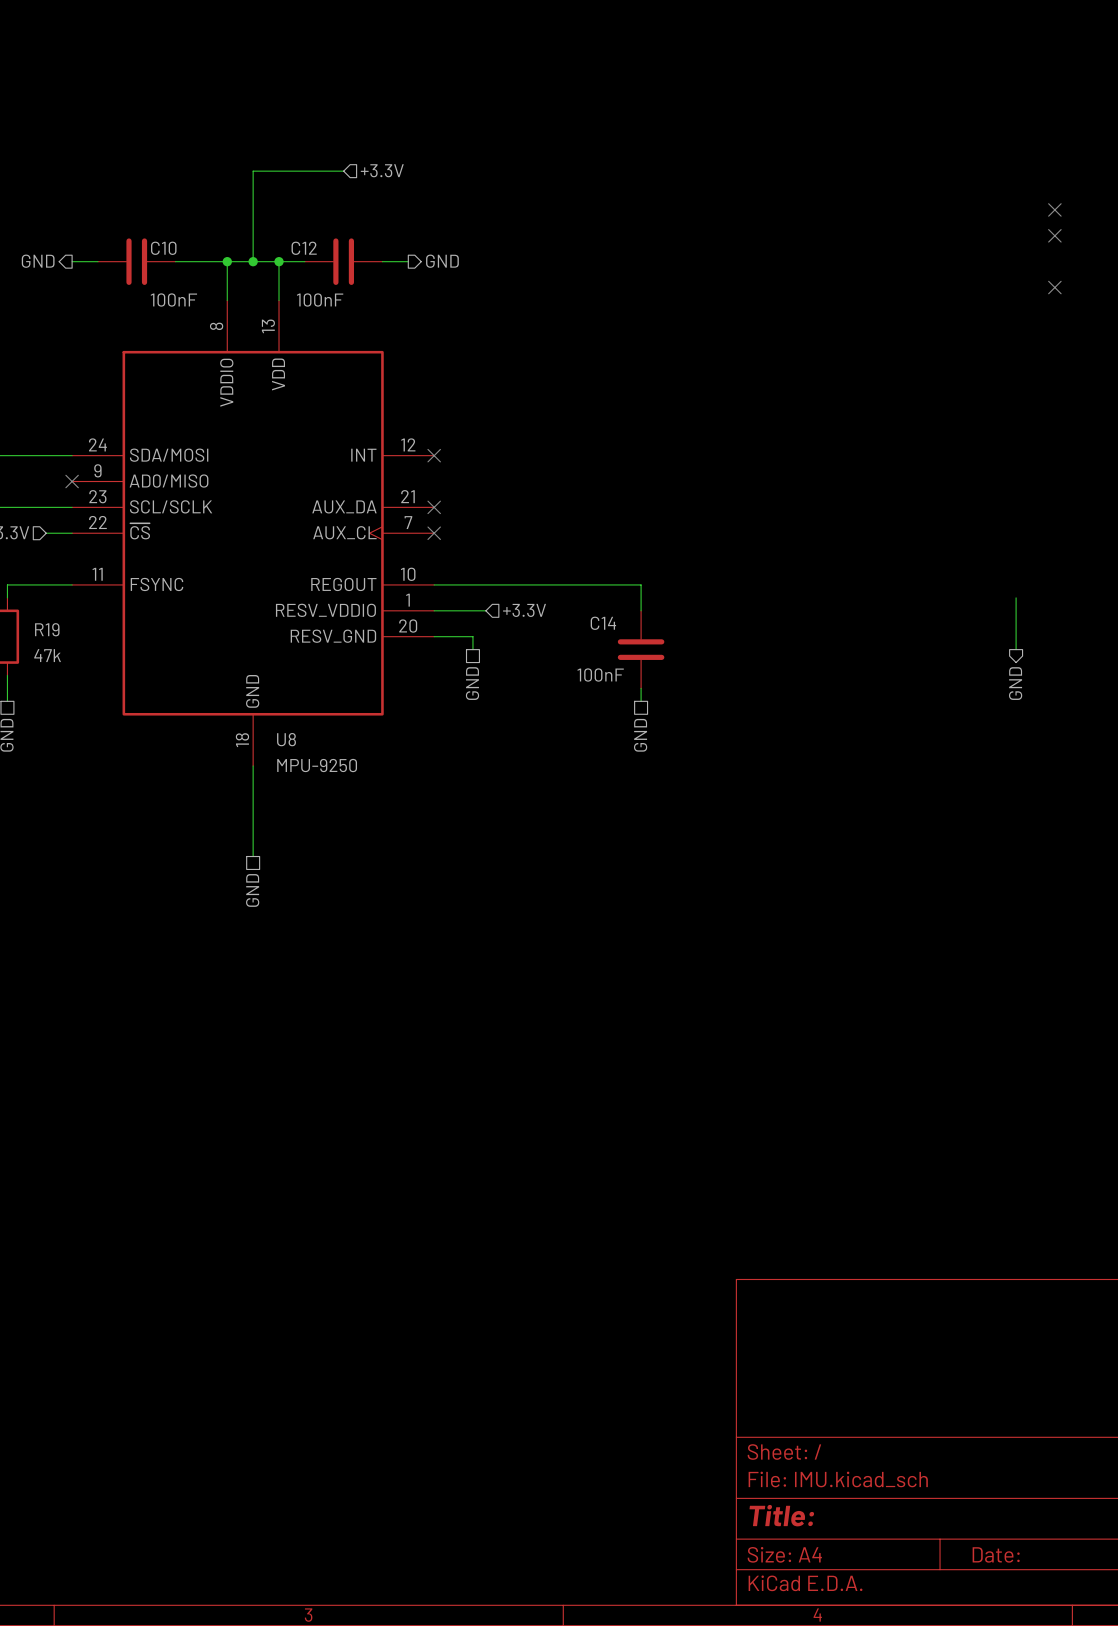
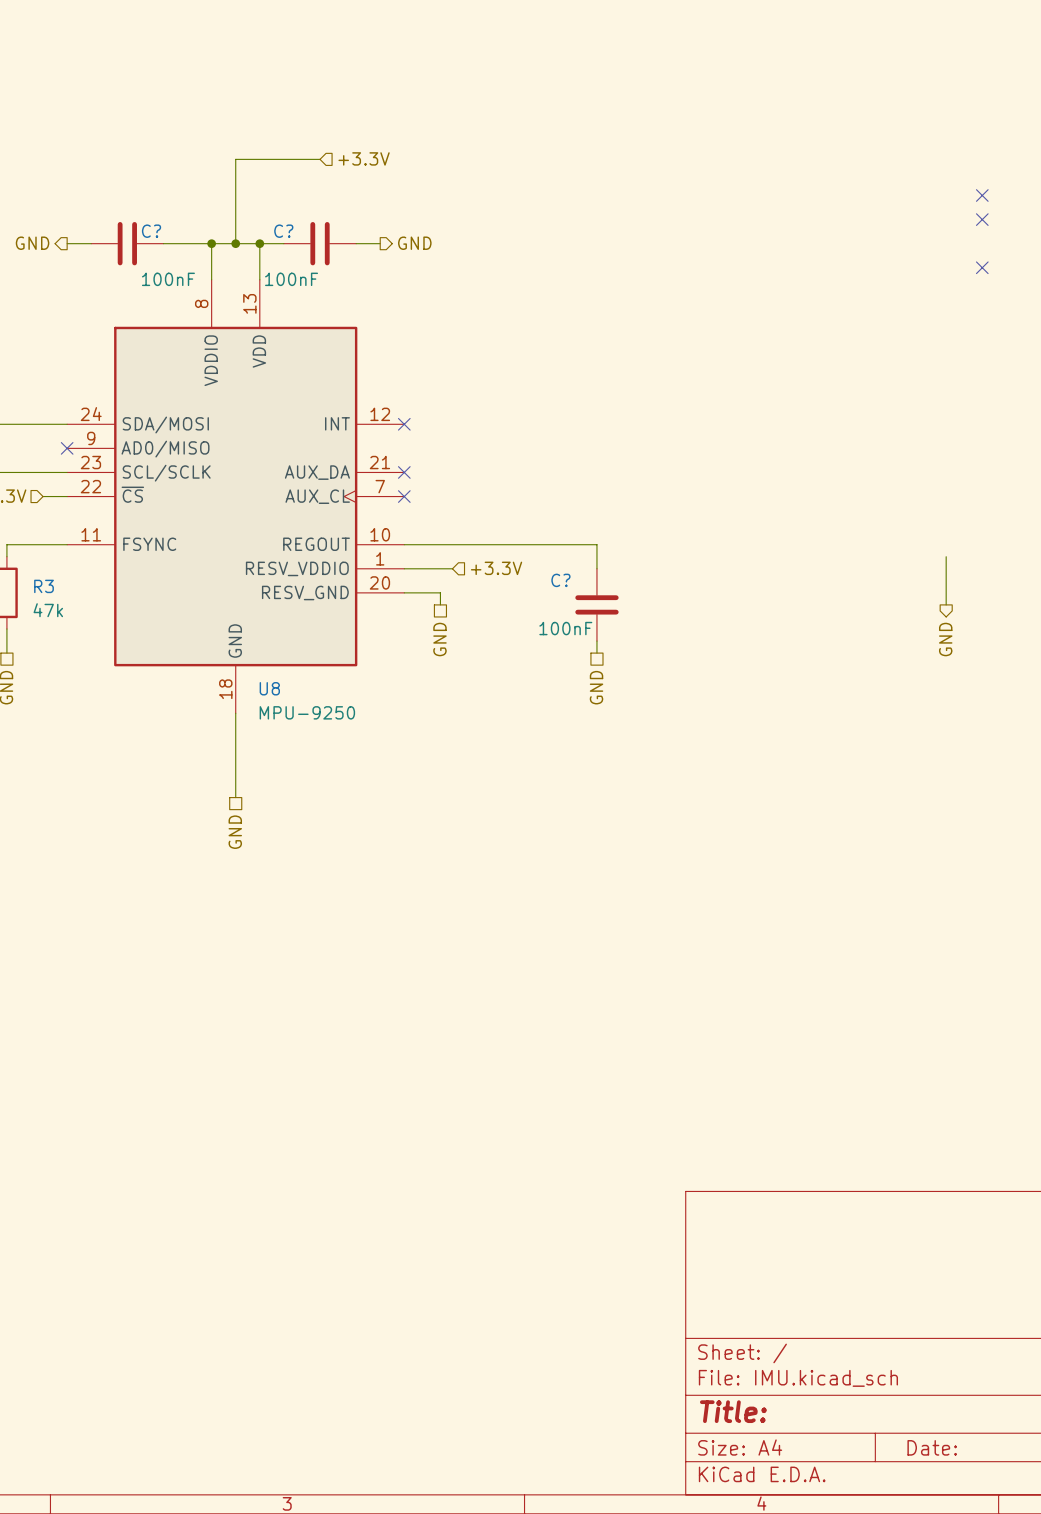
C10 name: C10 (163, 248) -> C? (151, 231)
C12 name: C12 (304, 248) -> C? (283, 231)
C14 name: C14 (603, 623) -> C? (560, 580)
R19 name: R19 (47, 629) -> R3 (44, 586)

